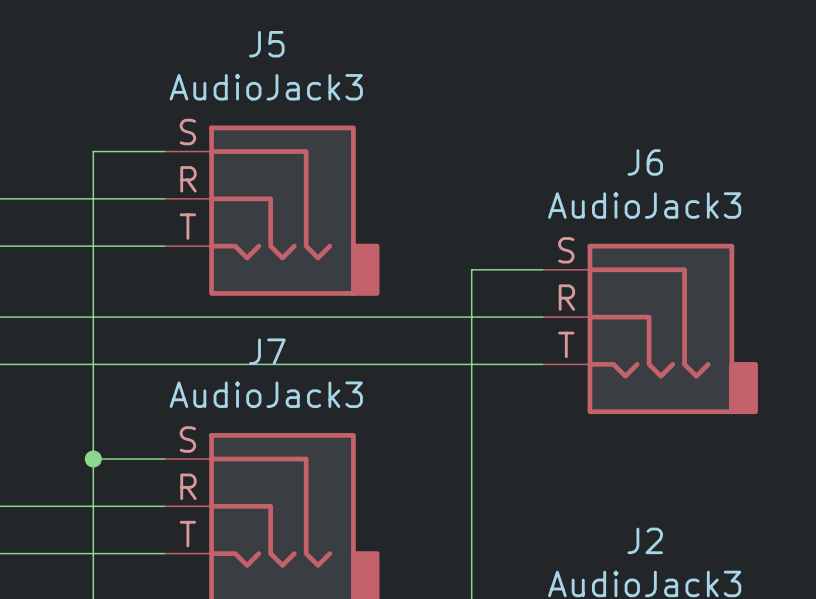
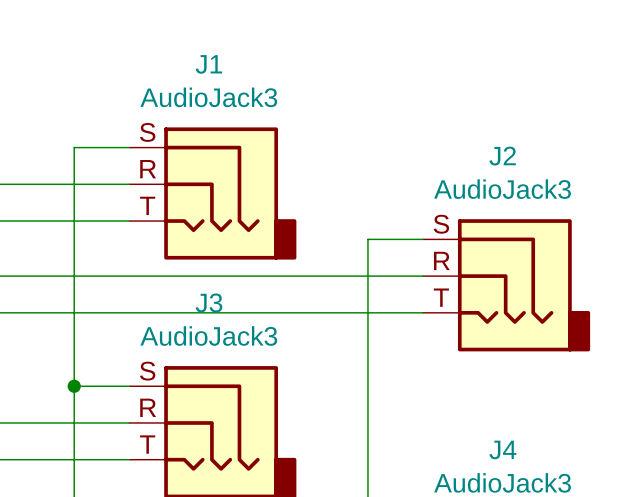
J5 name: J5 (266, 44) -> J1 (208, 64)
J6 name: J6 (645, 162) -> J2 (502, 156)
J7 name: J7 (267, 351) -> J3 (208, 302)
J2 name: J2 (645, 540) -> J4 (502, 449)

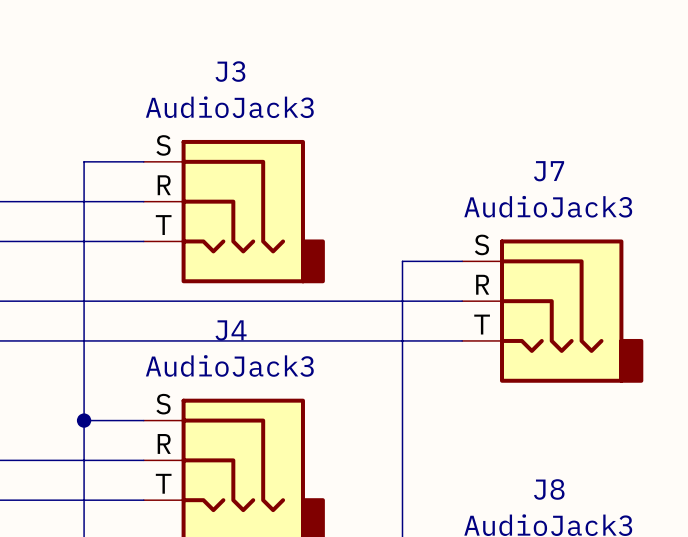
J1 name: J1 (208, 64) -> J3 (230, 71)
J2 name: J2 (502, 156) -> J7 (549, 171)
J3 name: J3 (208, 302) -> J4 (231, 330)
J4 name: J4 (502, 449) -> J8 (549, 489)

